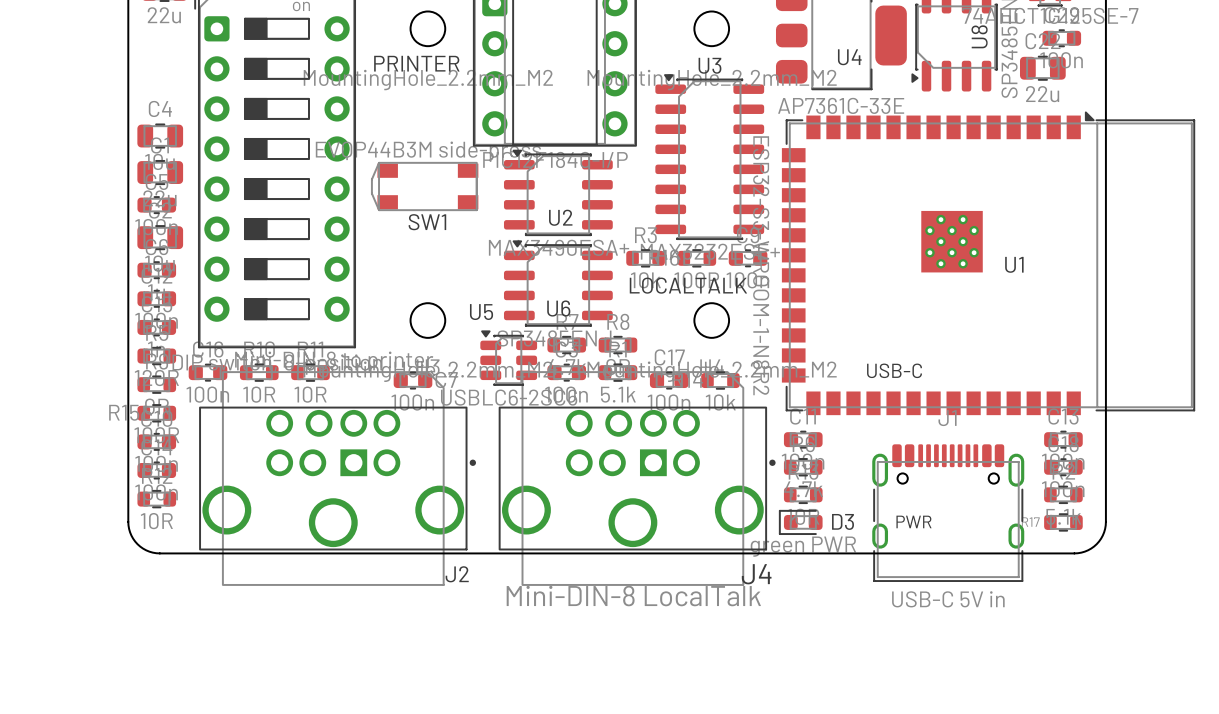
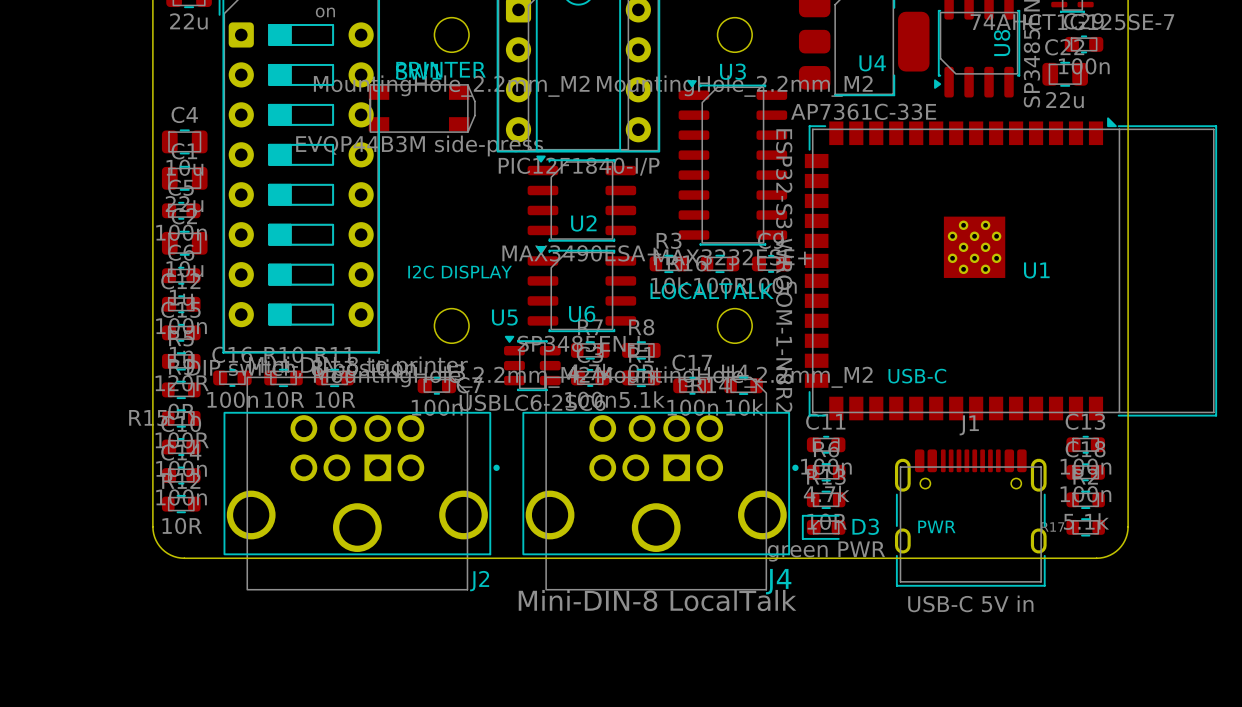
SW1 rotation: 0° (424, 186) -> 180° (422, 108)
SW1 position: (424, 186) -> (422, 108)
text: none -> I2C DISPLAY (460, 272)

